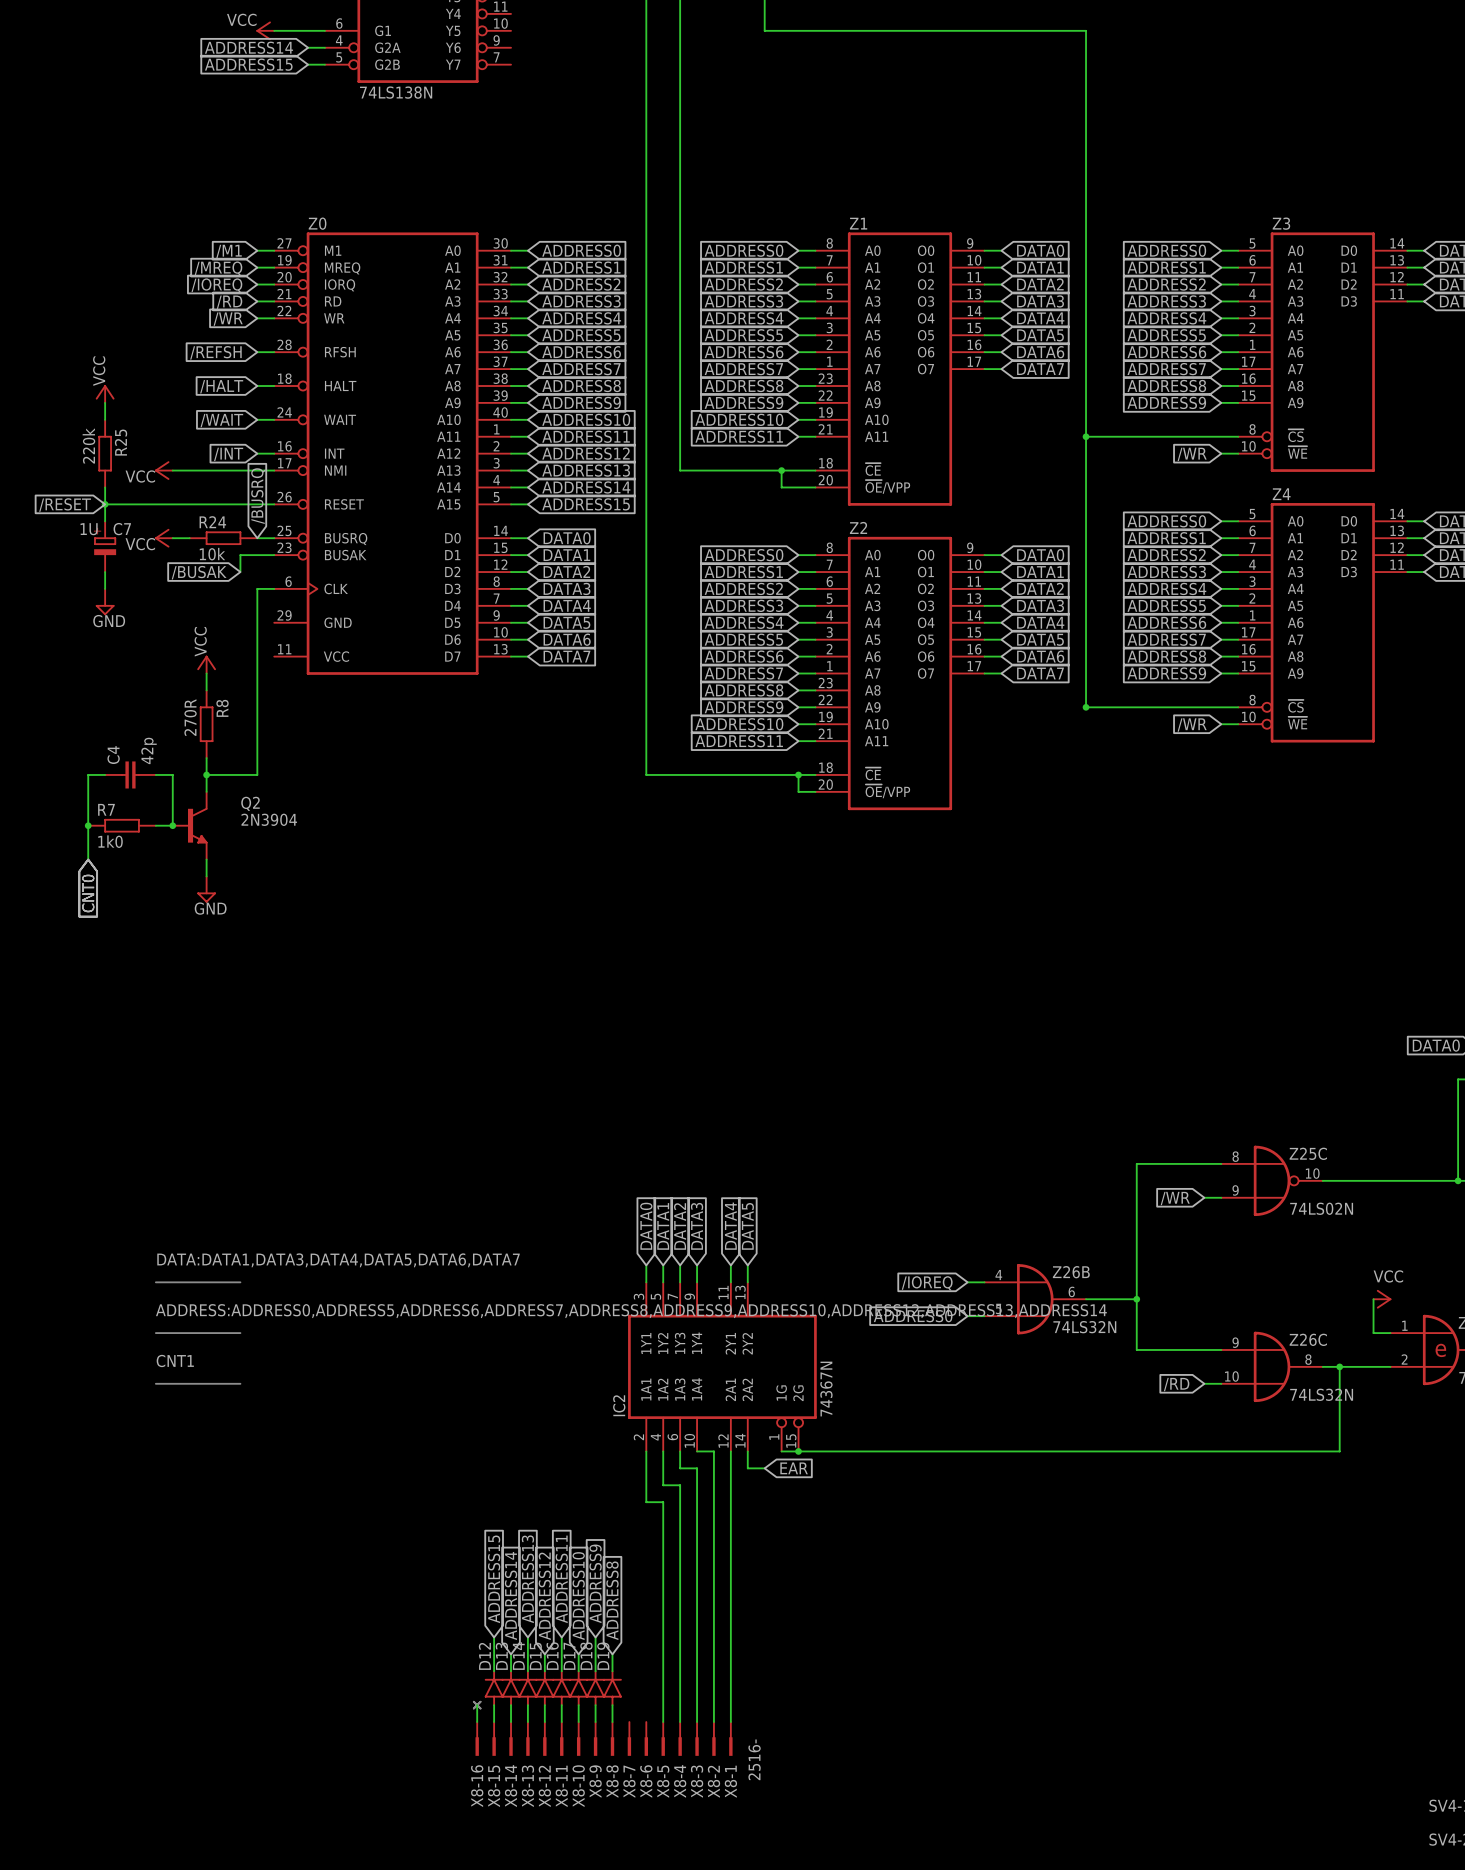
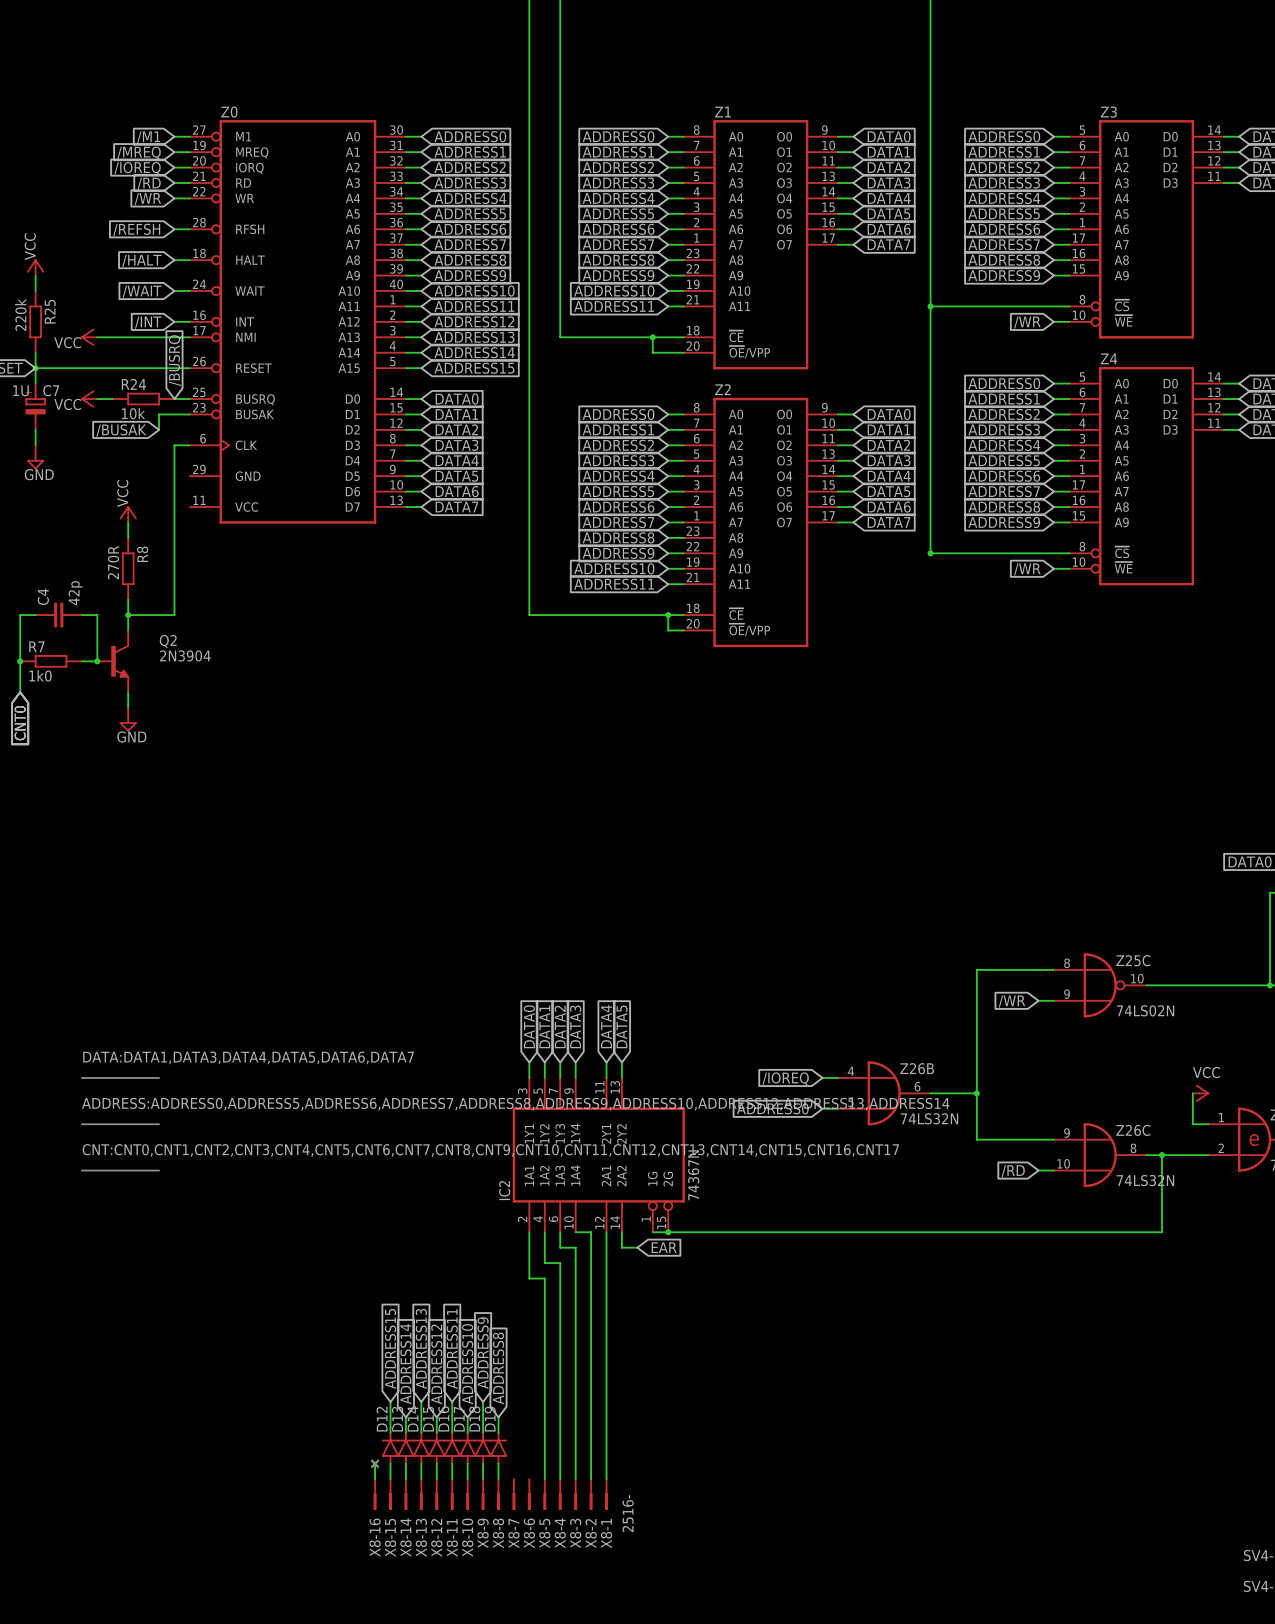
label: CNT1 (175, 1360) -> CNT:CNT0,CNT1,CNT2,CNT3,CNT4,CNT5,CNT6,CNT7,CNT8,CNT9,CNT10,CNT11,CNT12,CNT13,CNT14,CNT15,CNT16,CNT17 (490, 1150)

